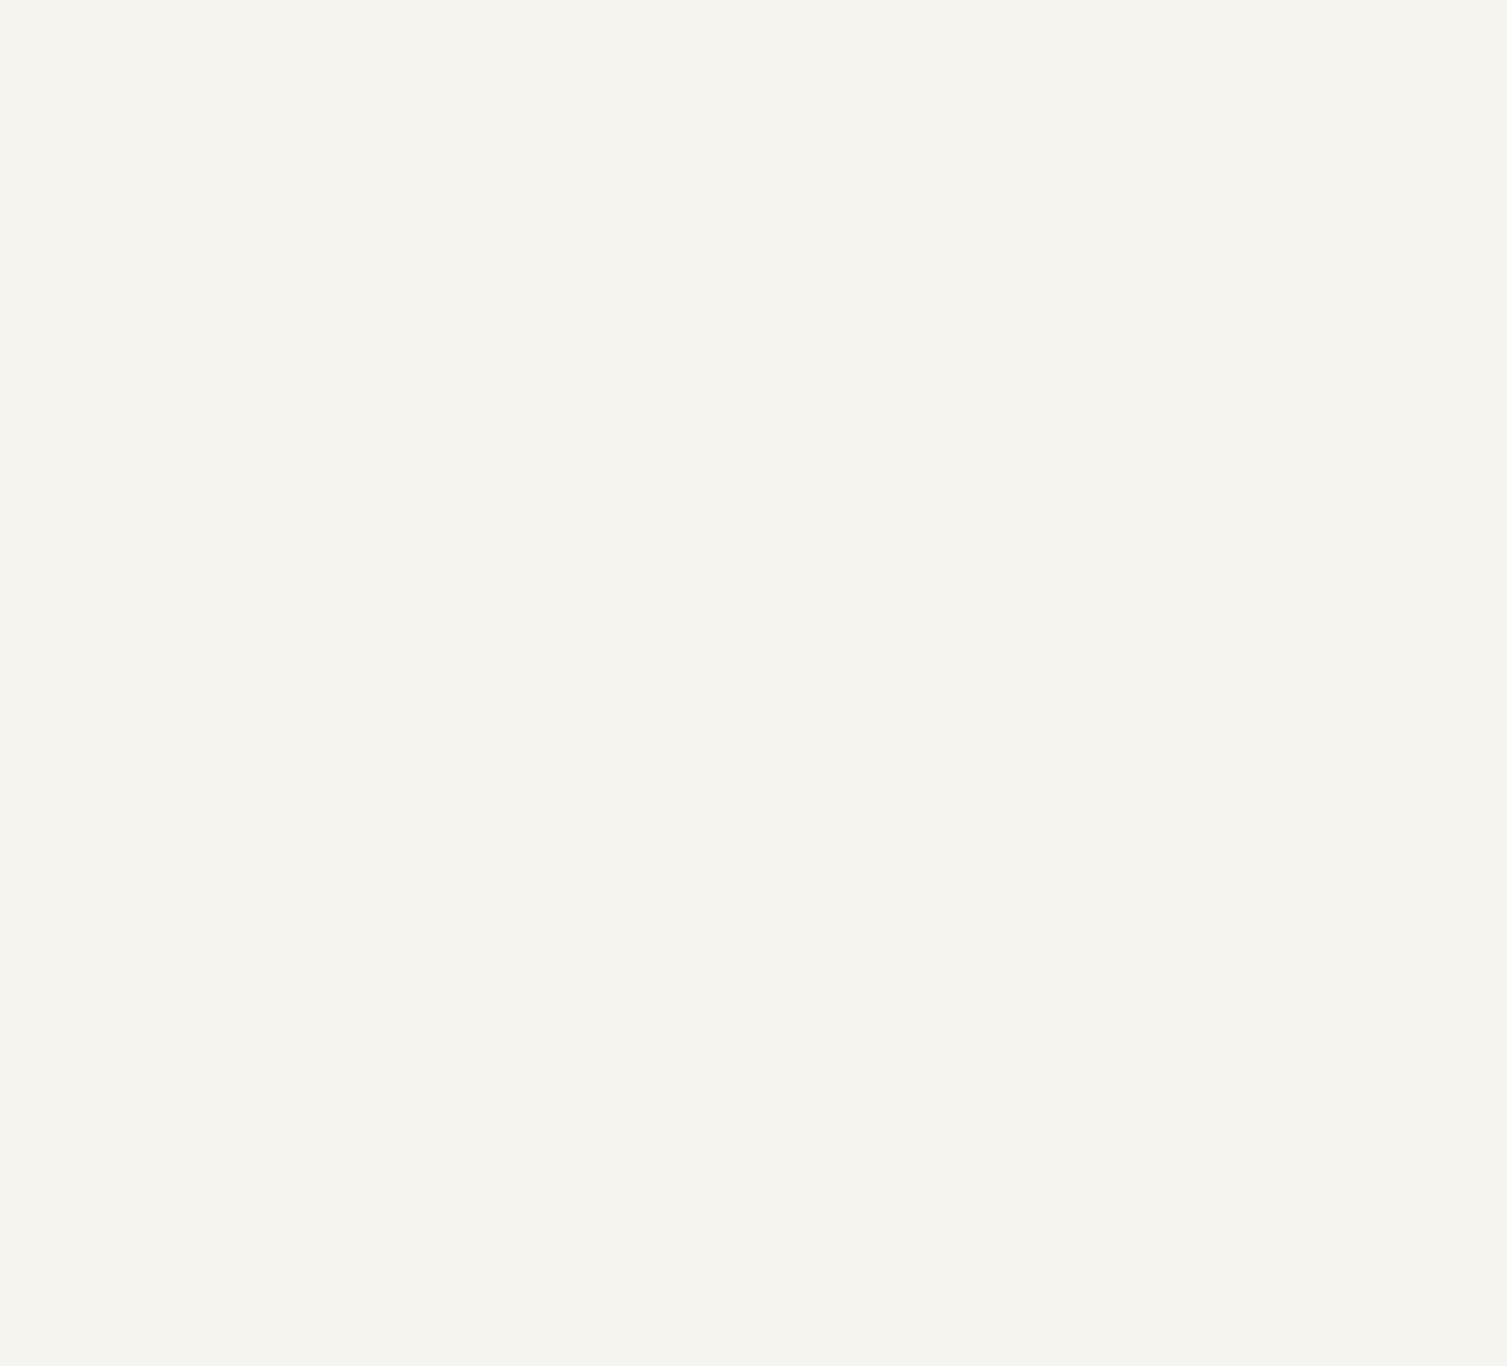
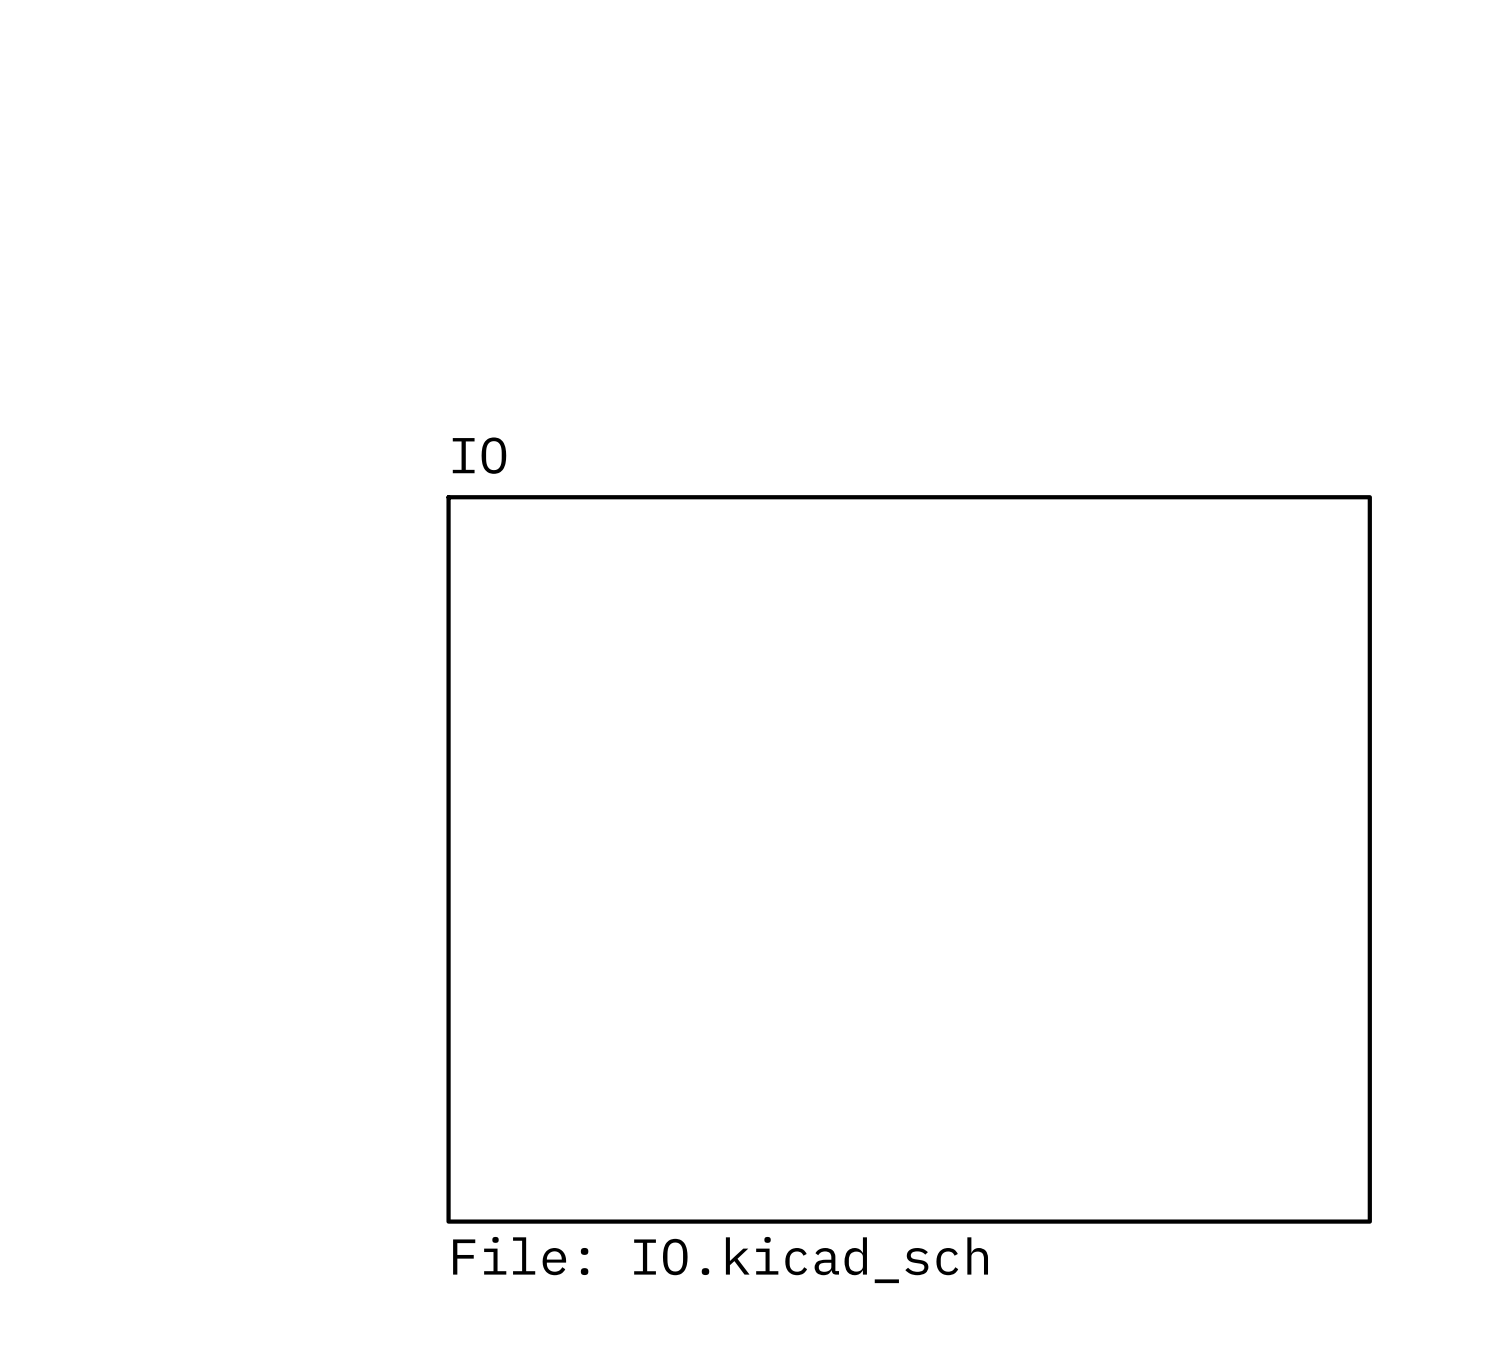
sheet IO: none -> File: IO.kicad_sch (909, 859)

